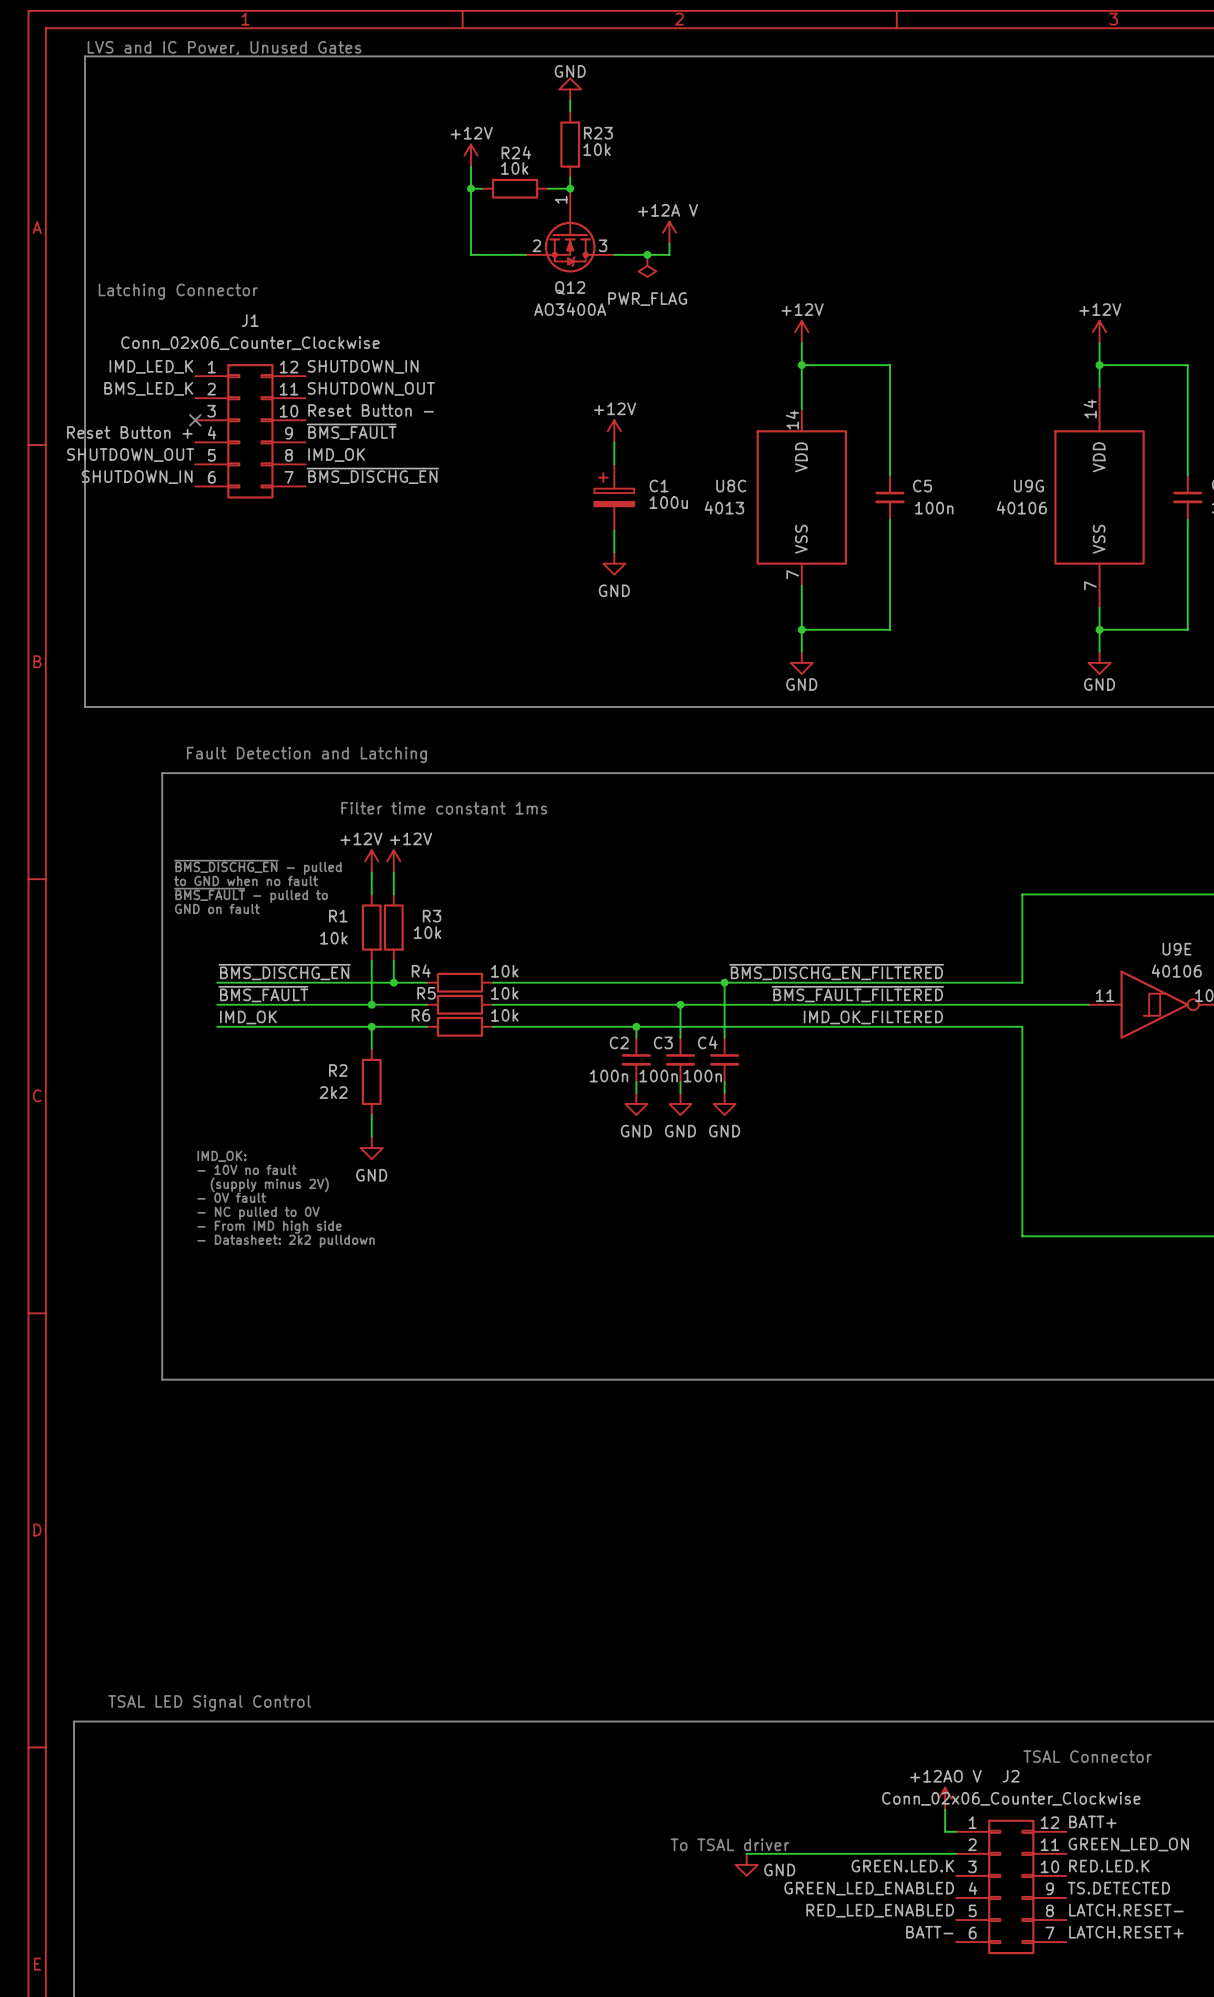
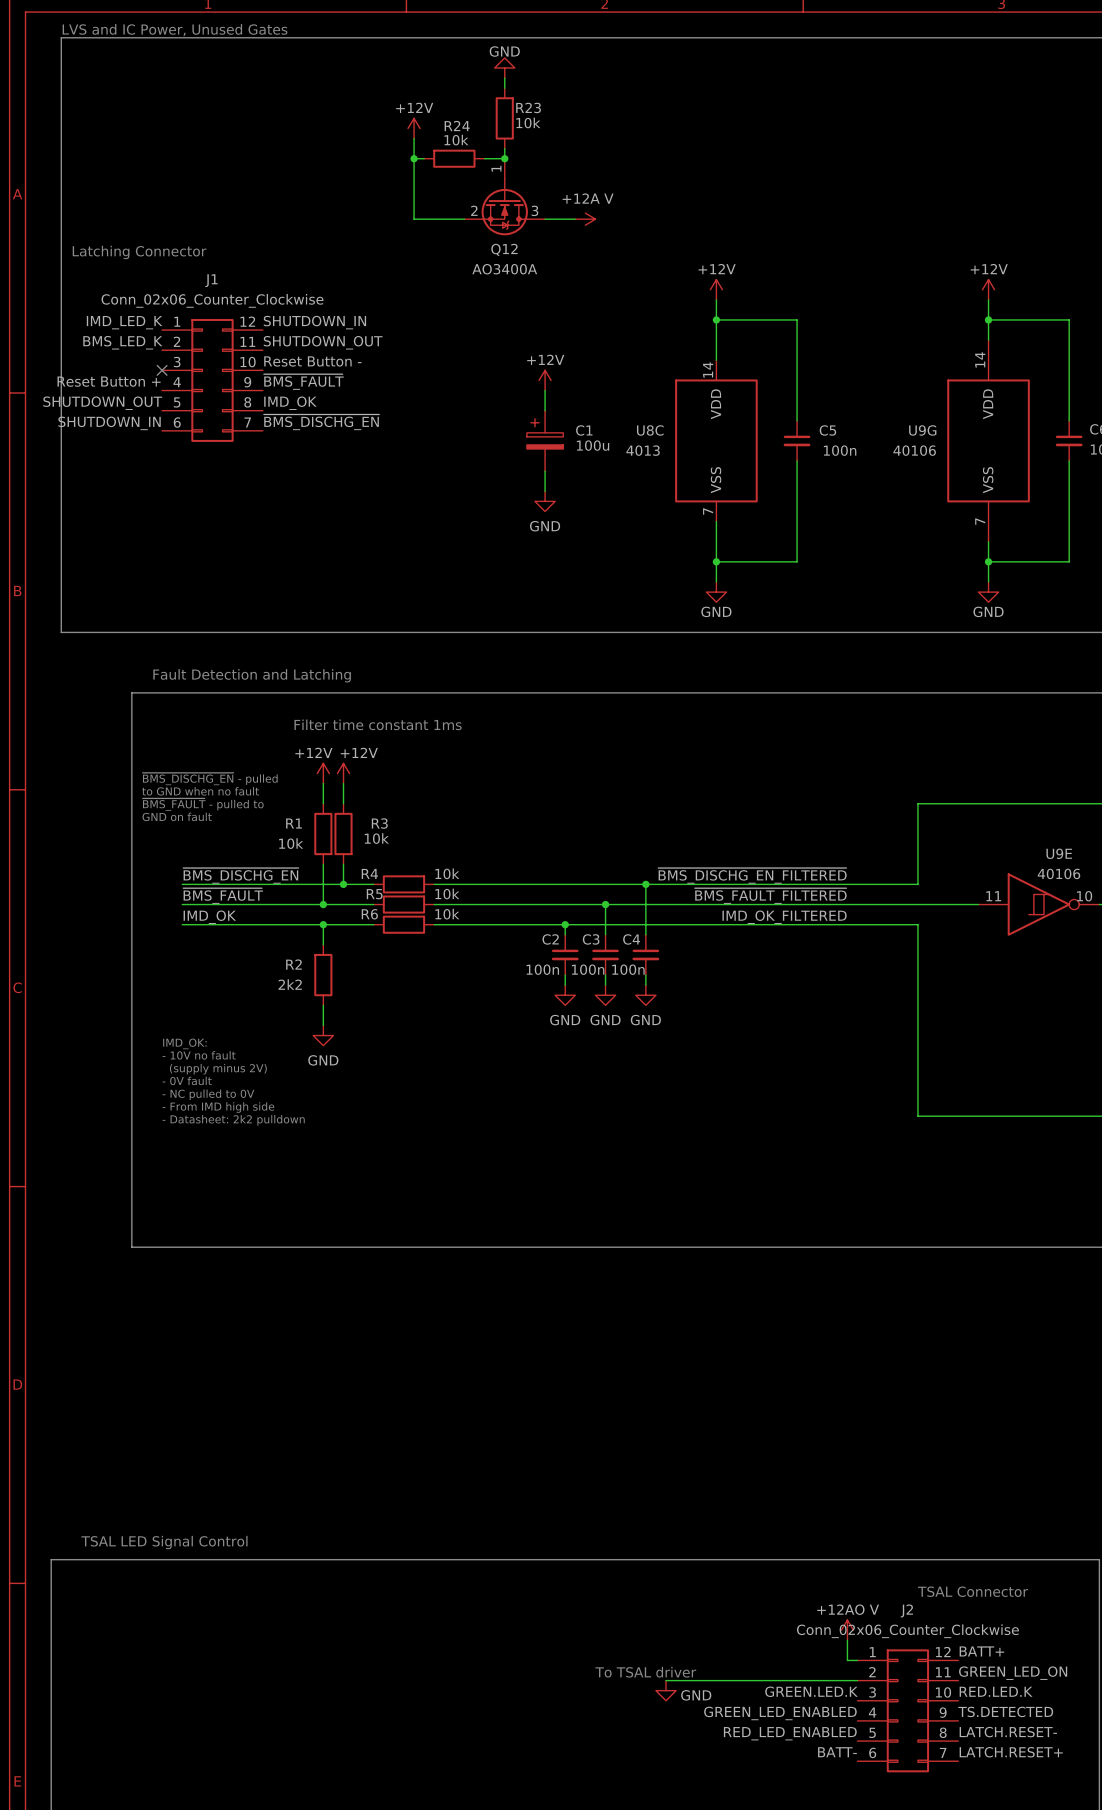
power symbol rotation: 0° (669, 232) -> 90° clockwise (585, 219)
power symbol position: +12A V (669, 232) -> +12A V (585, 219)
junction: (647, 254) -> none
power symbol: PWR_FLAG (647, 265) -> none

